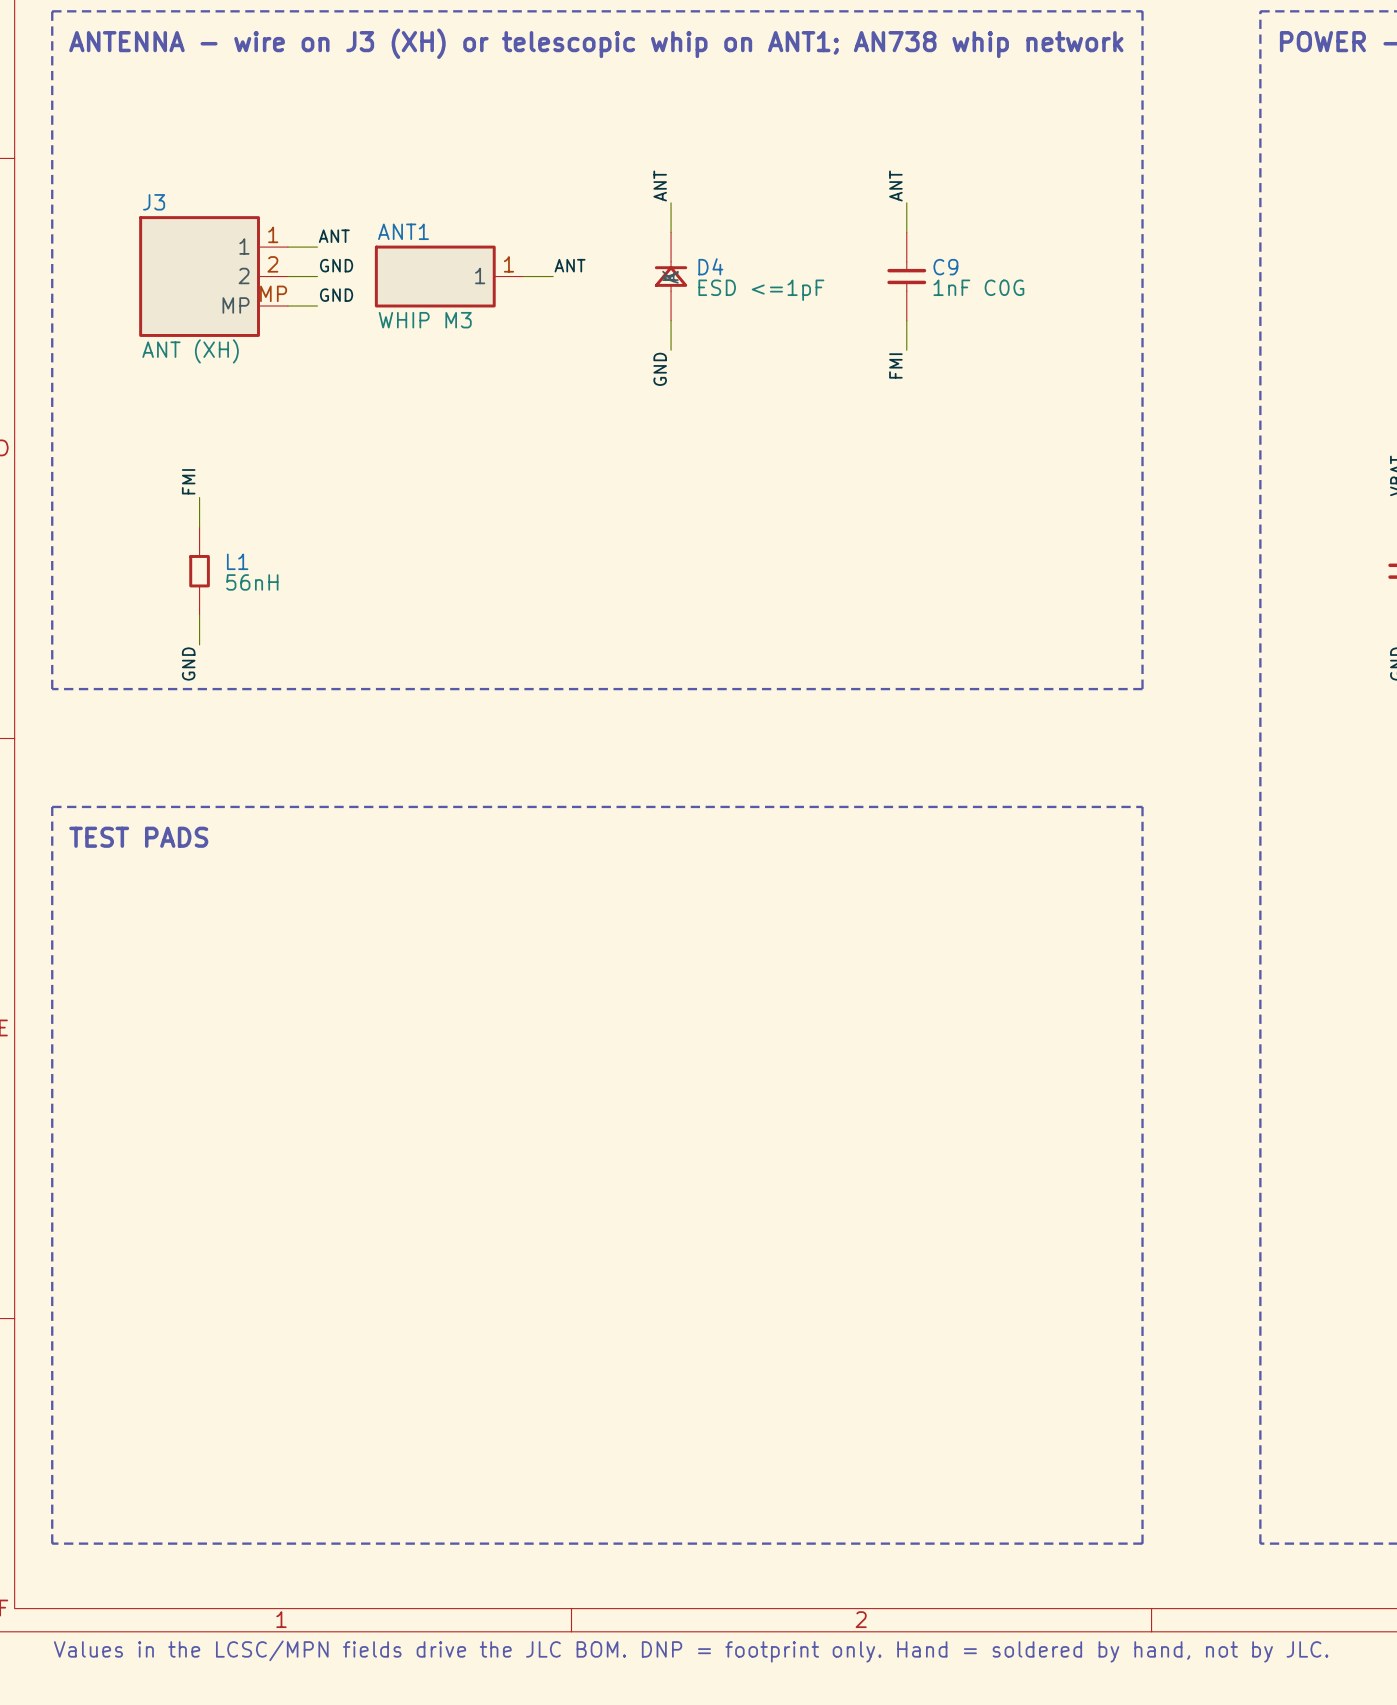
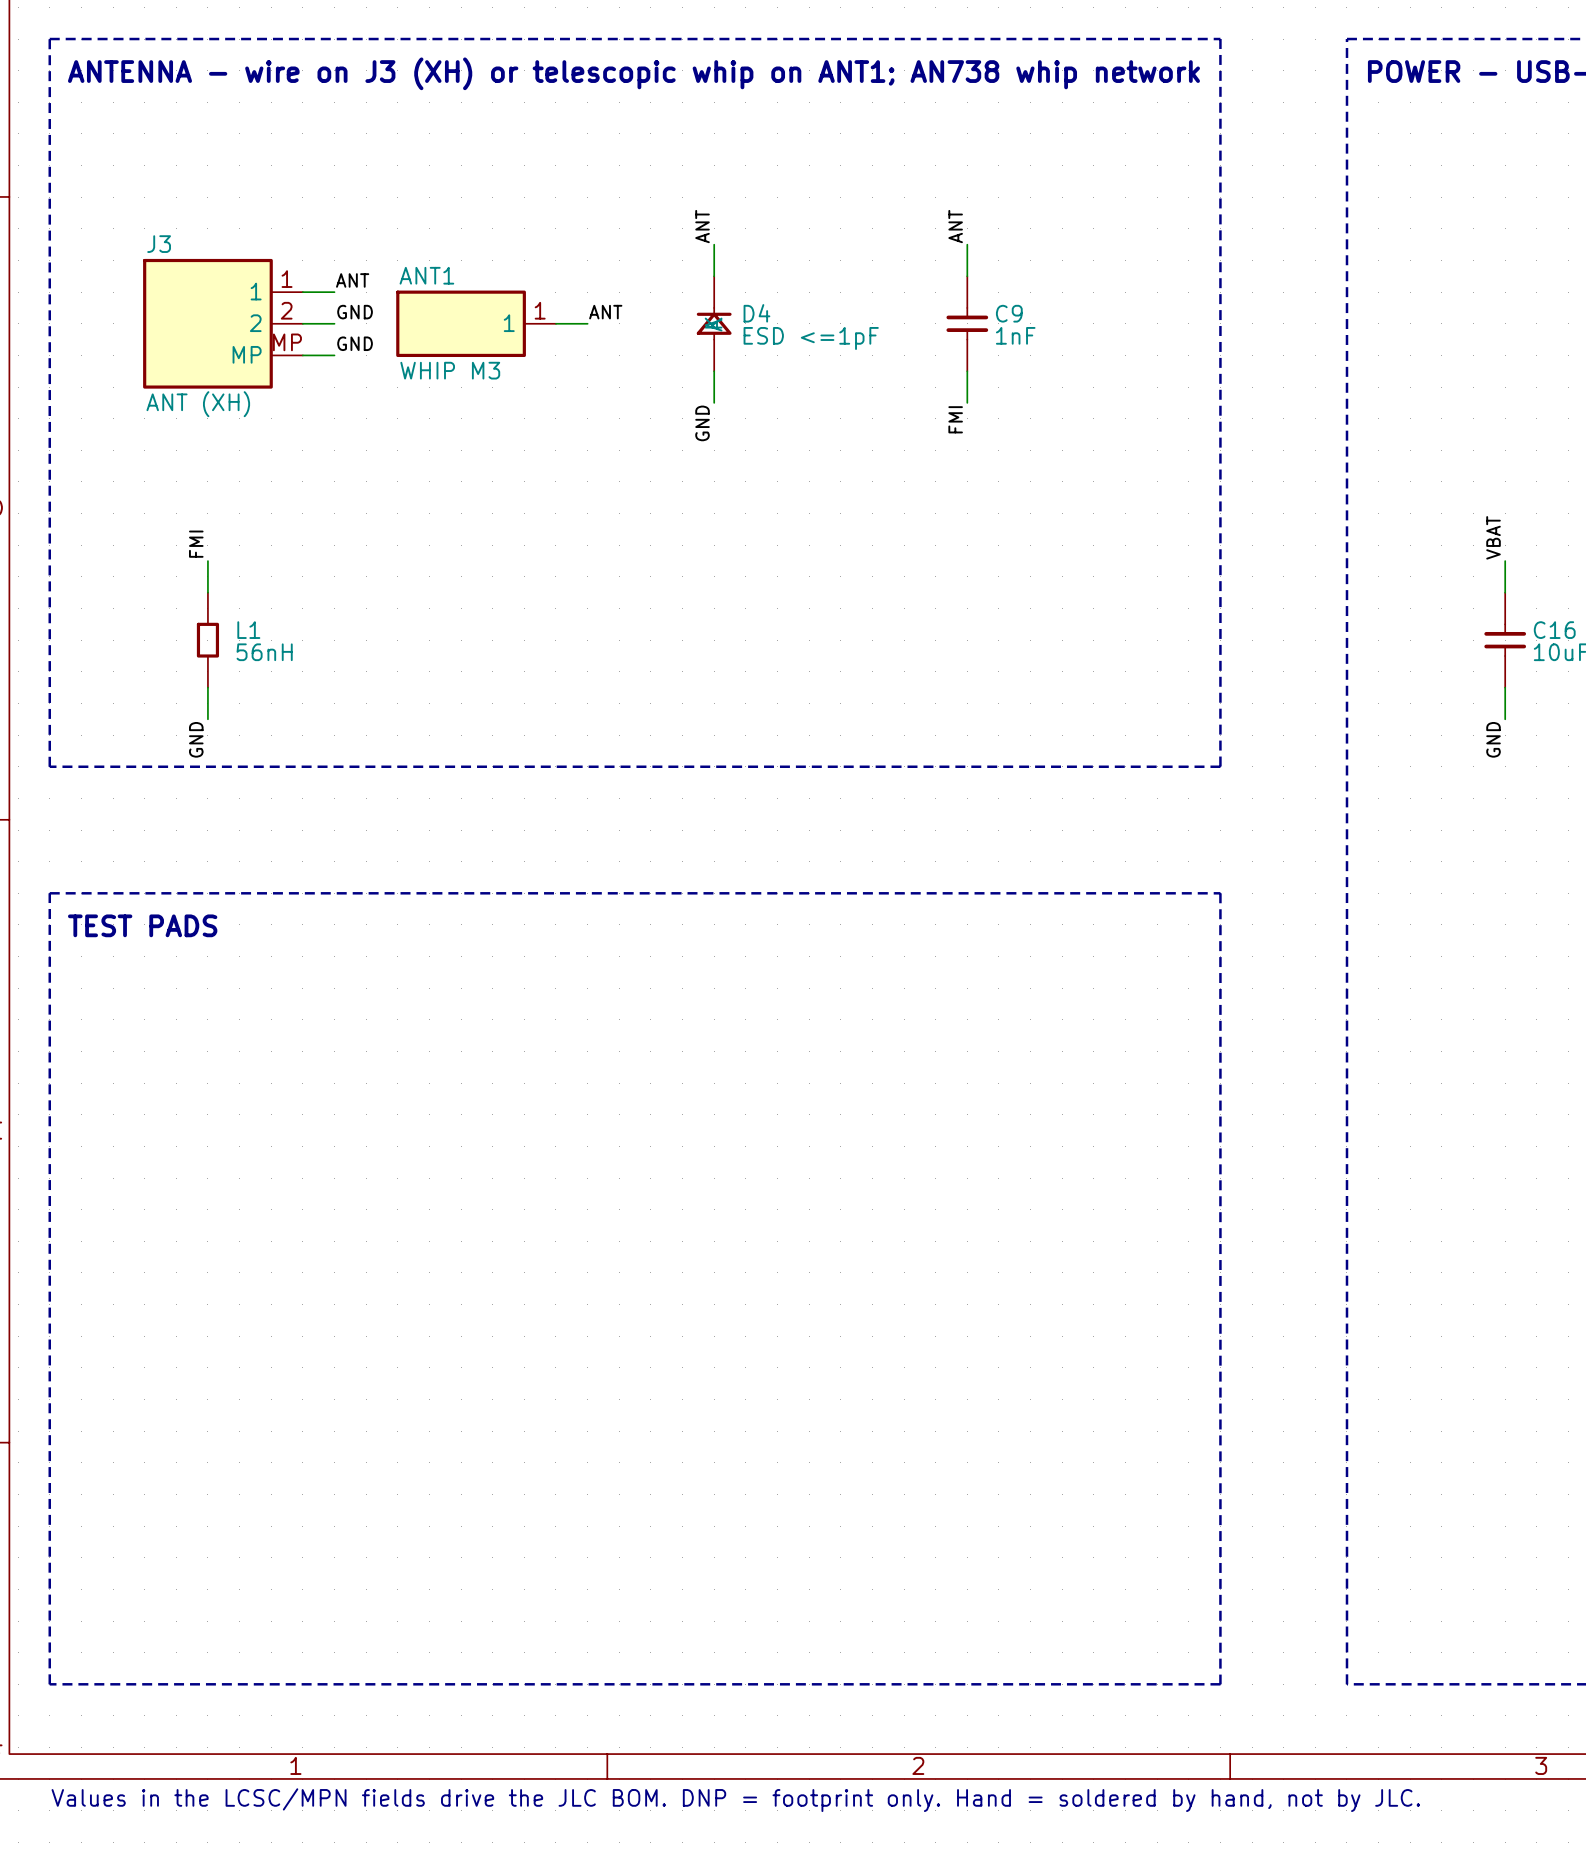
C9 value: 1nF C0G (978, 287) -> 1nF (1015, 335)

